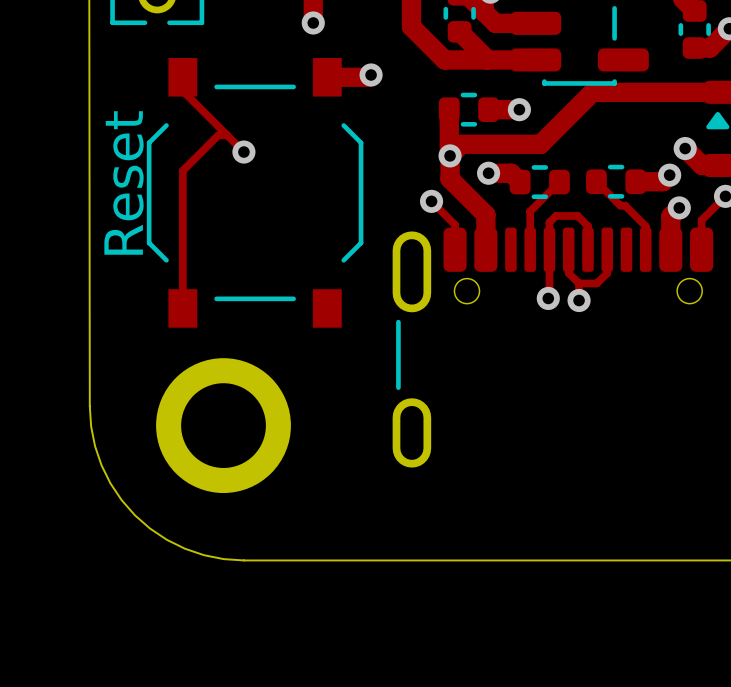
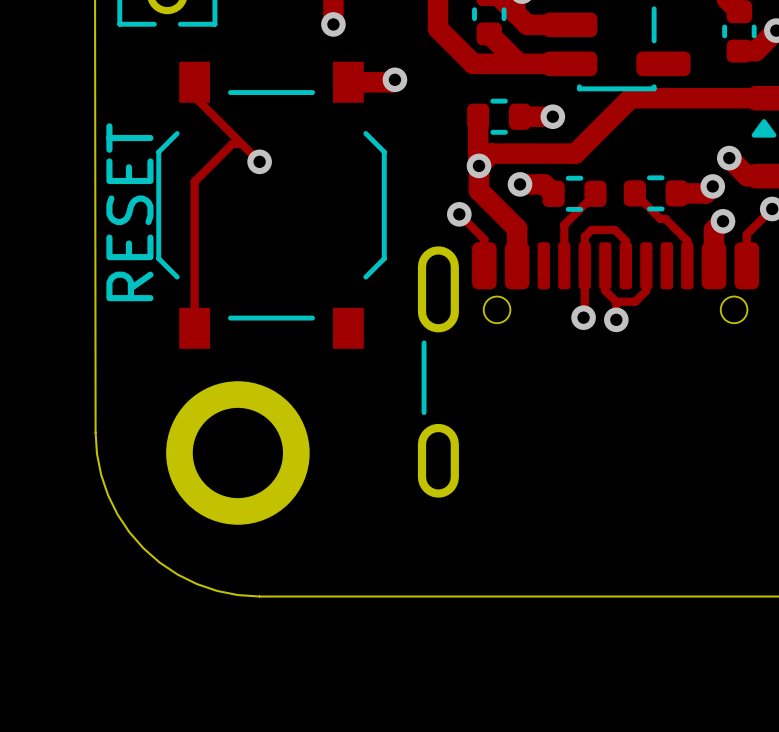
text: Reset (124, 182) -> none
RESET name: none -> RESET (129, 212)

